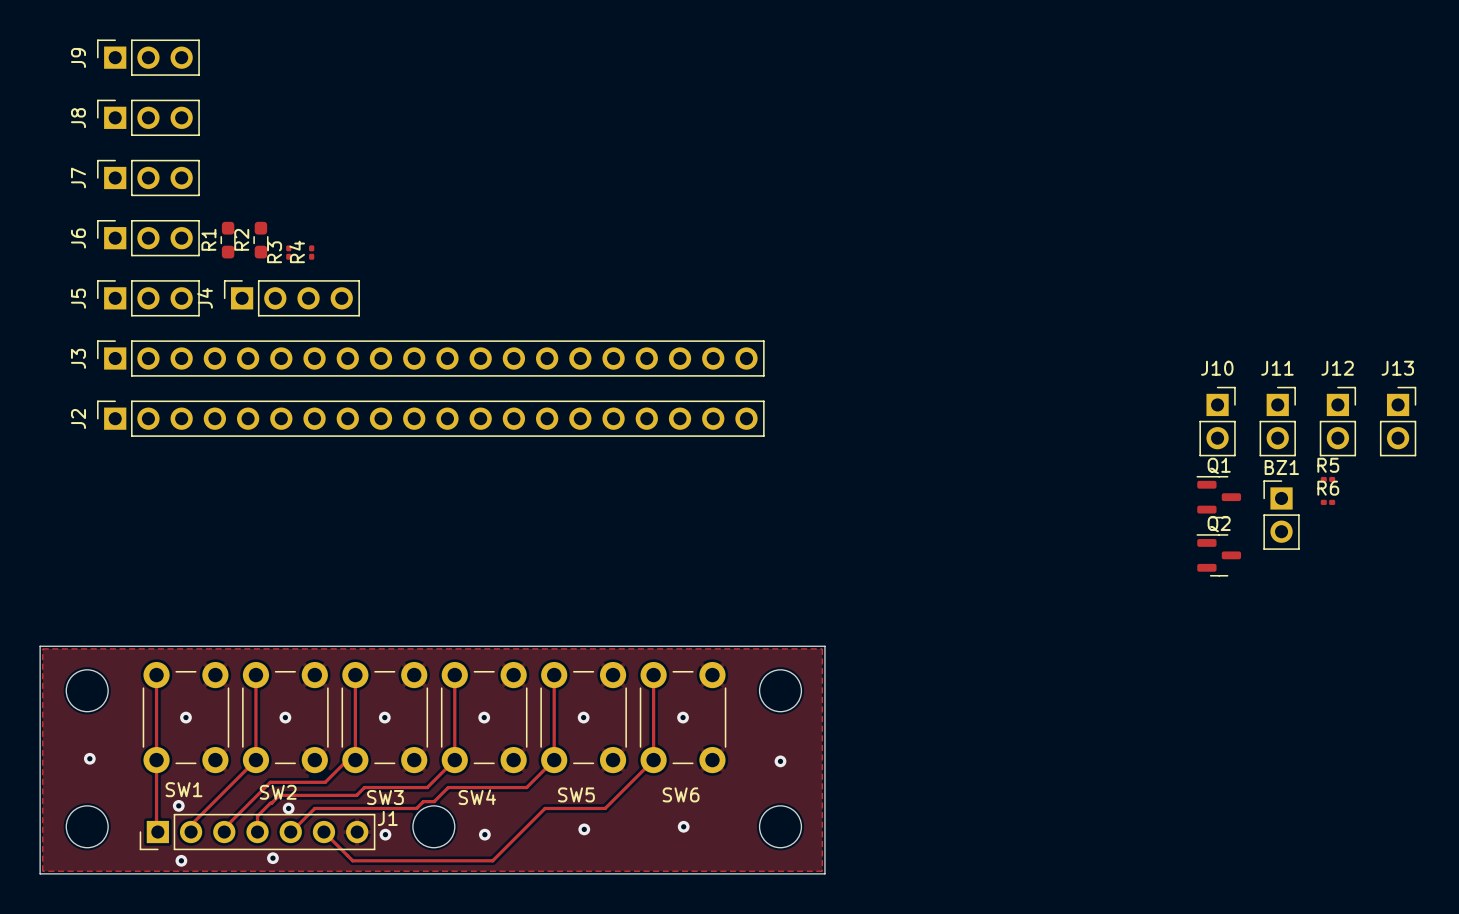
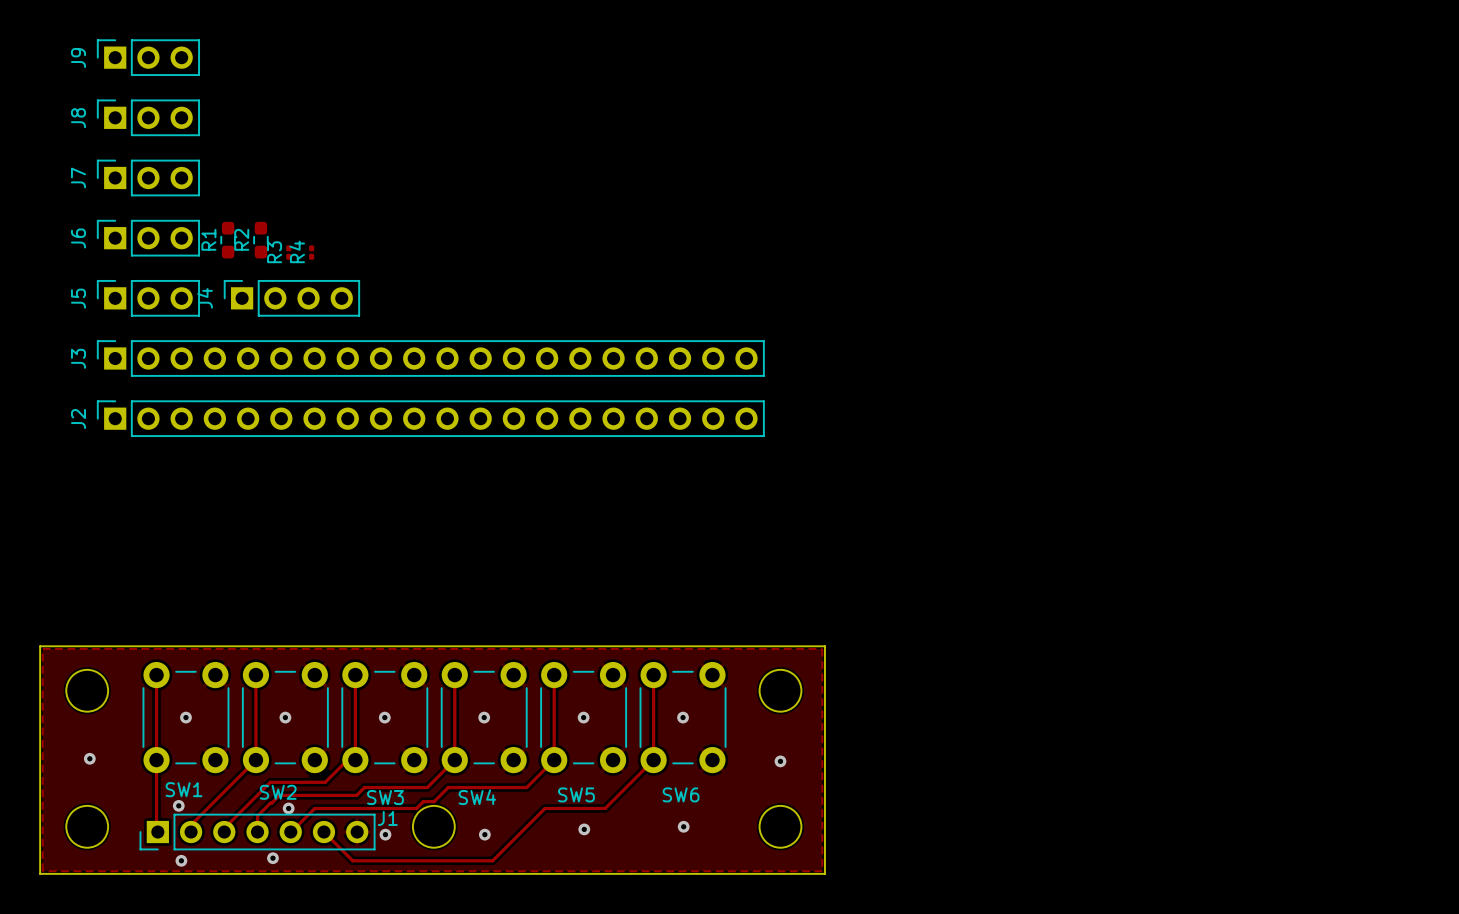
J10: (1217, 421) -> none
J11: (1277, 421) -> none
J12: (1337, 421) -> none
J13: (1398, 421) -> none
R5: (1327, 479) -> none
Q1: (1218, 497) -> none
R6: (1327, 502) -> none
BZ1: (1281, 515) -> none
Q2: (1218, 555) -> none

